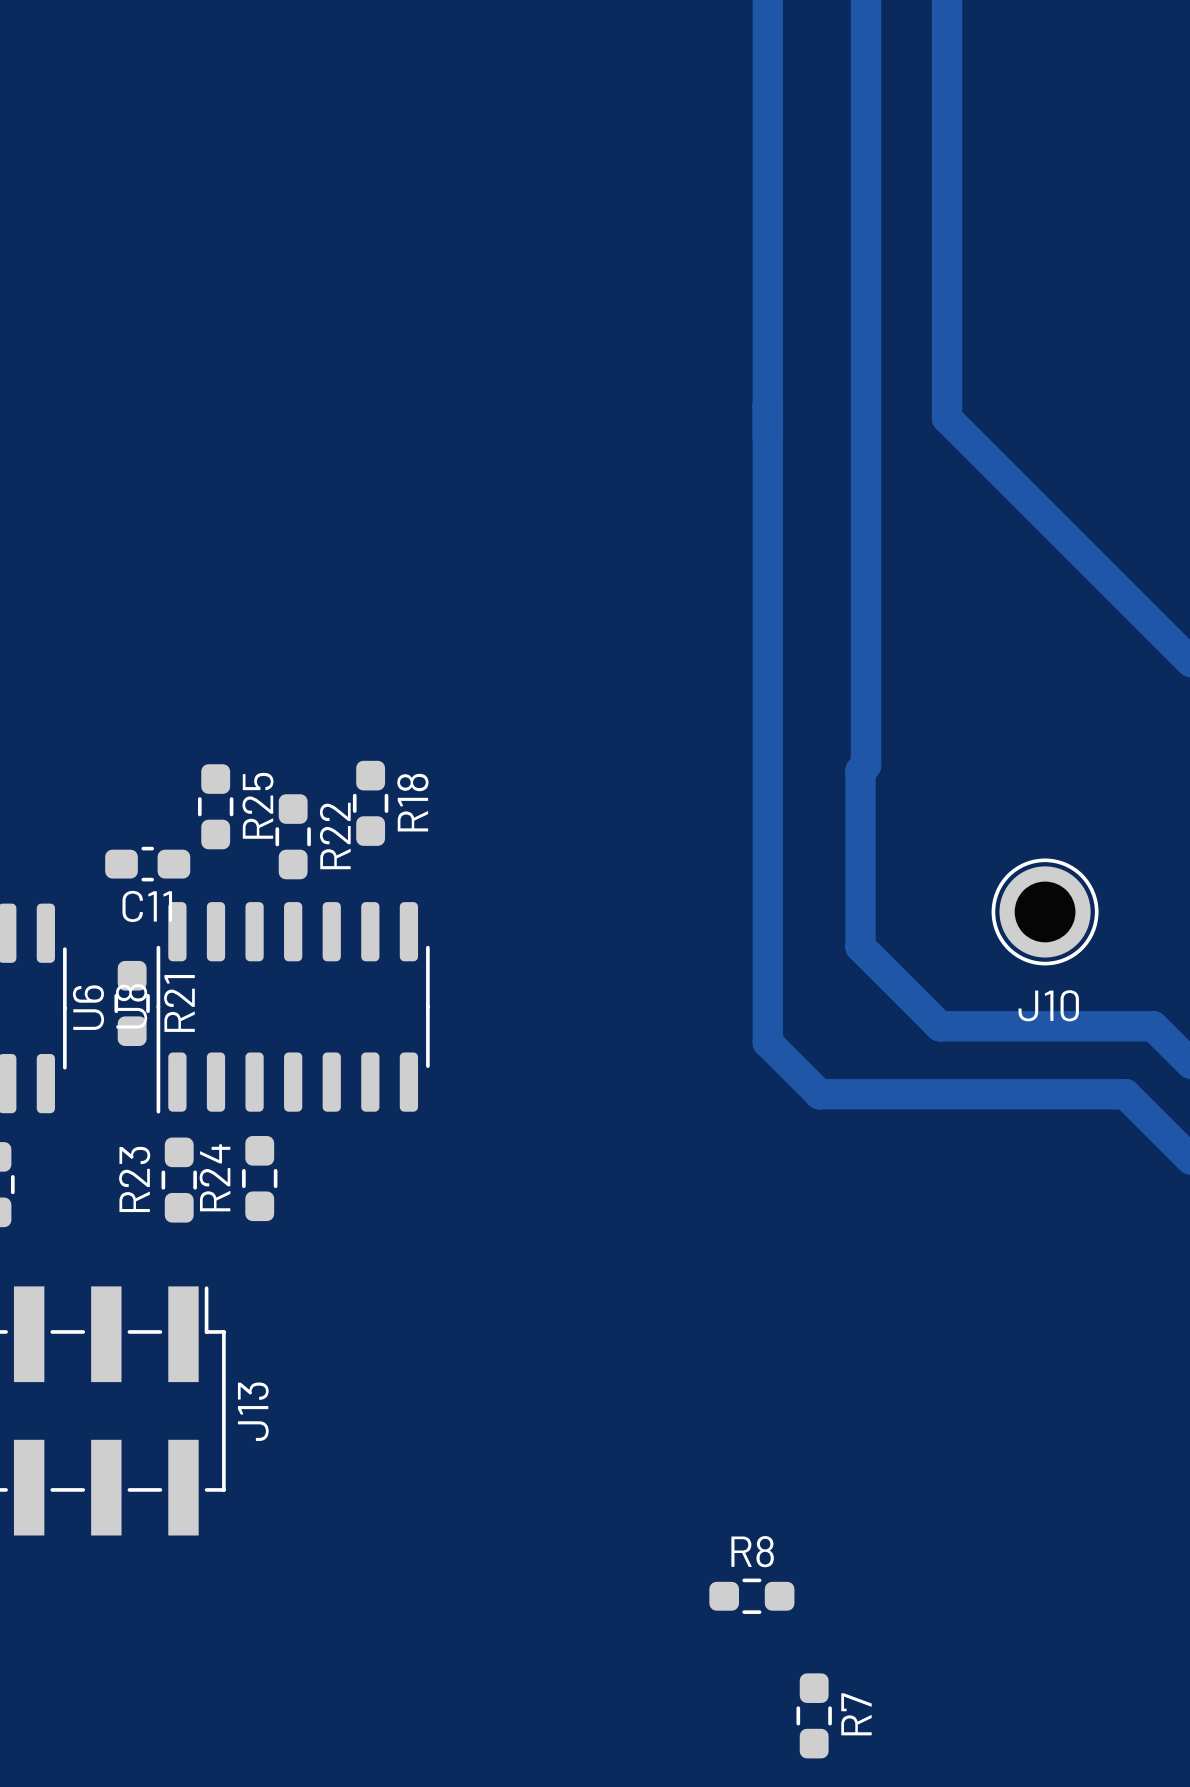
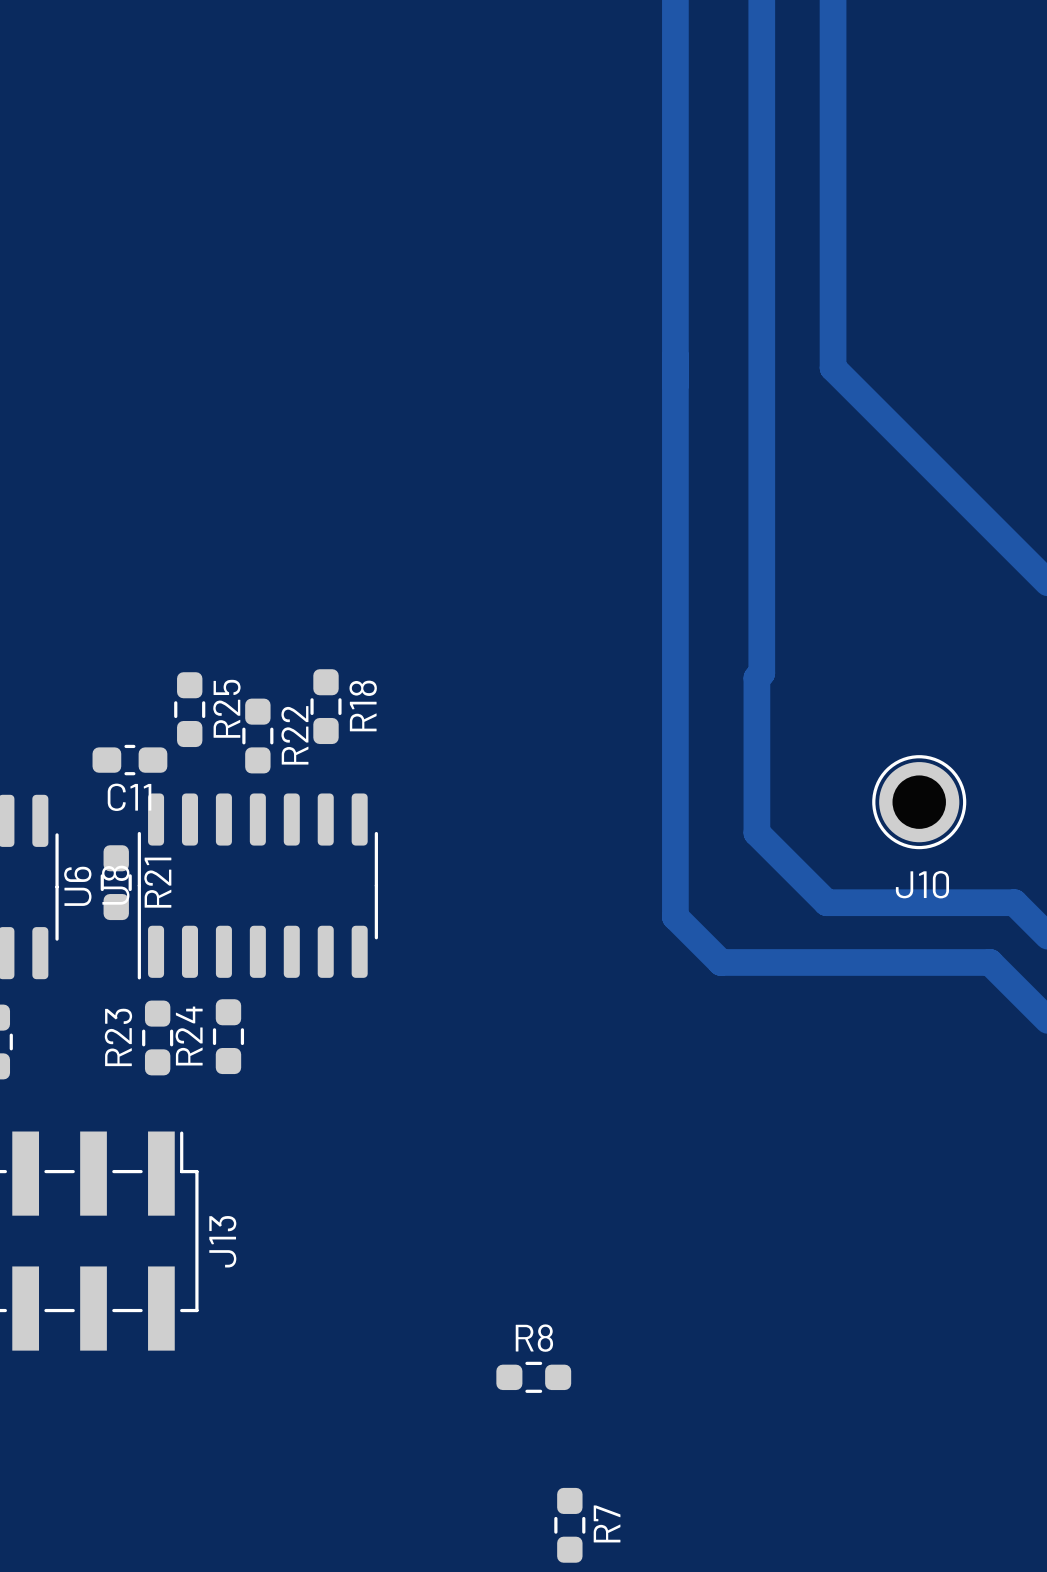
R8 position: (751, 1596) -> (533, 1377)
R7 position: (814, 1715) -> (569, 1525)

